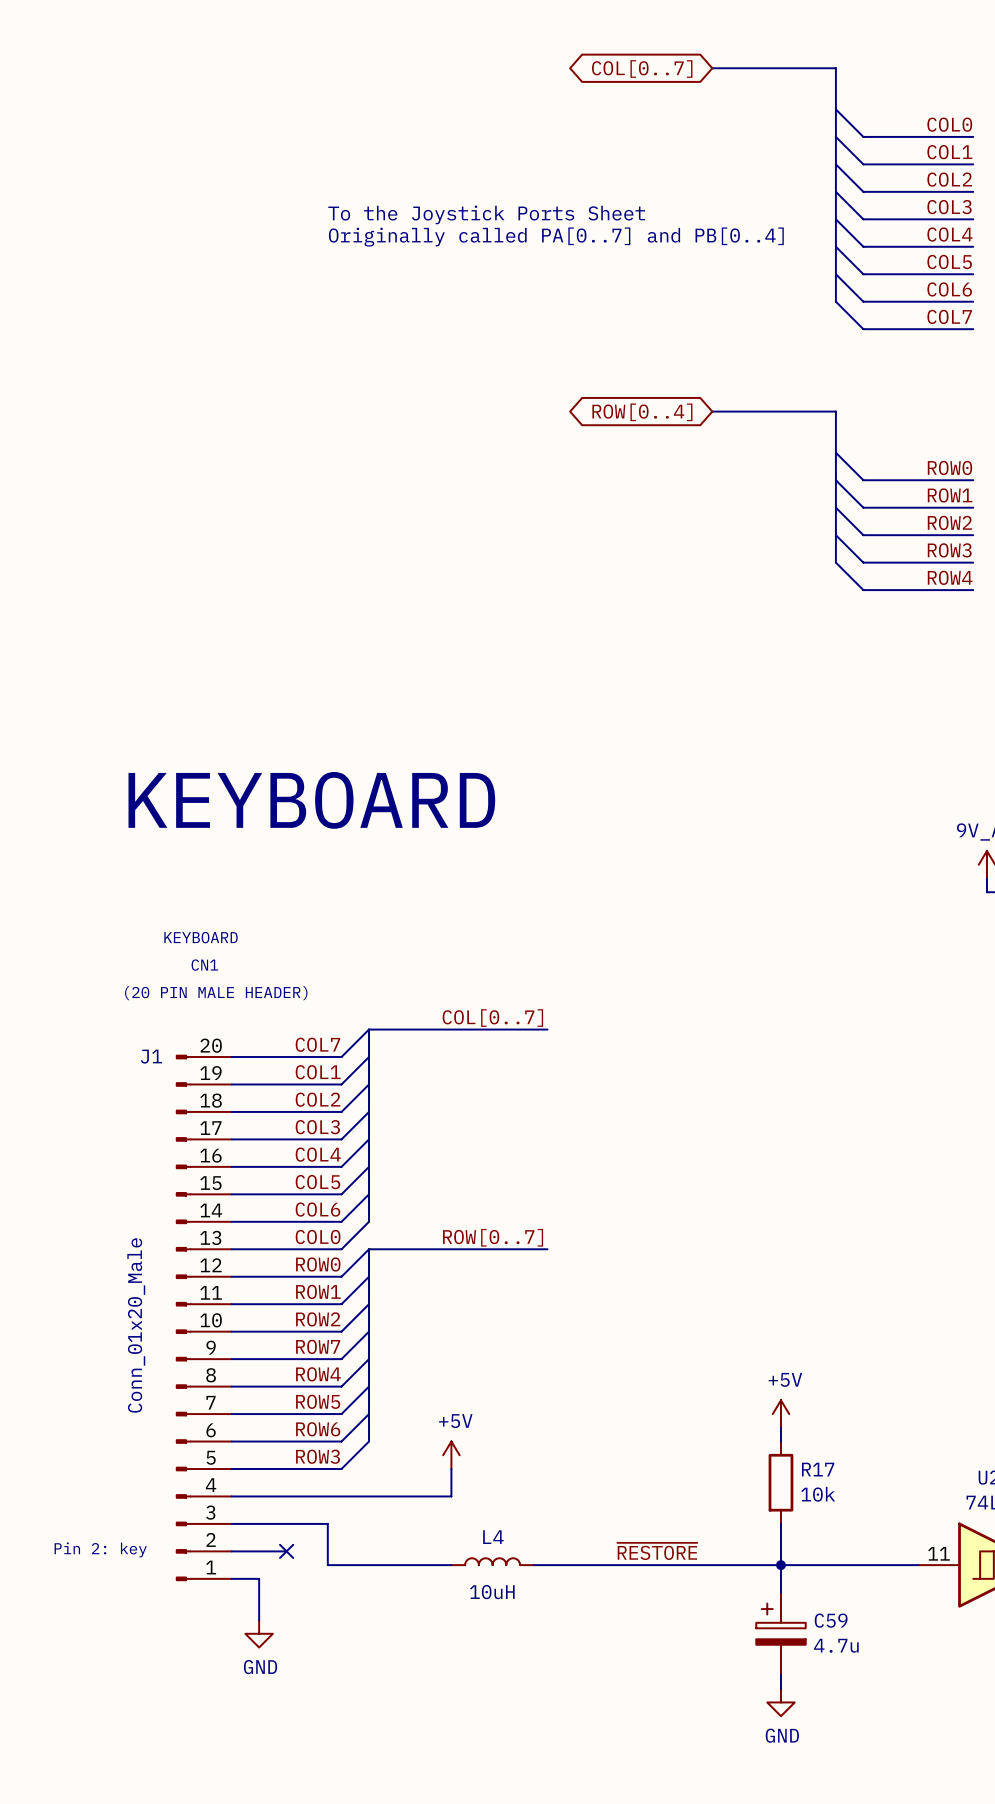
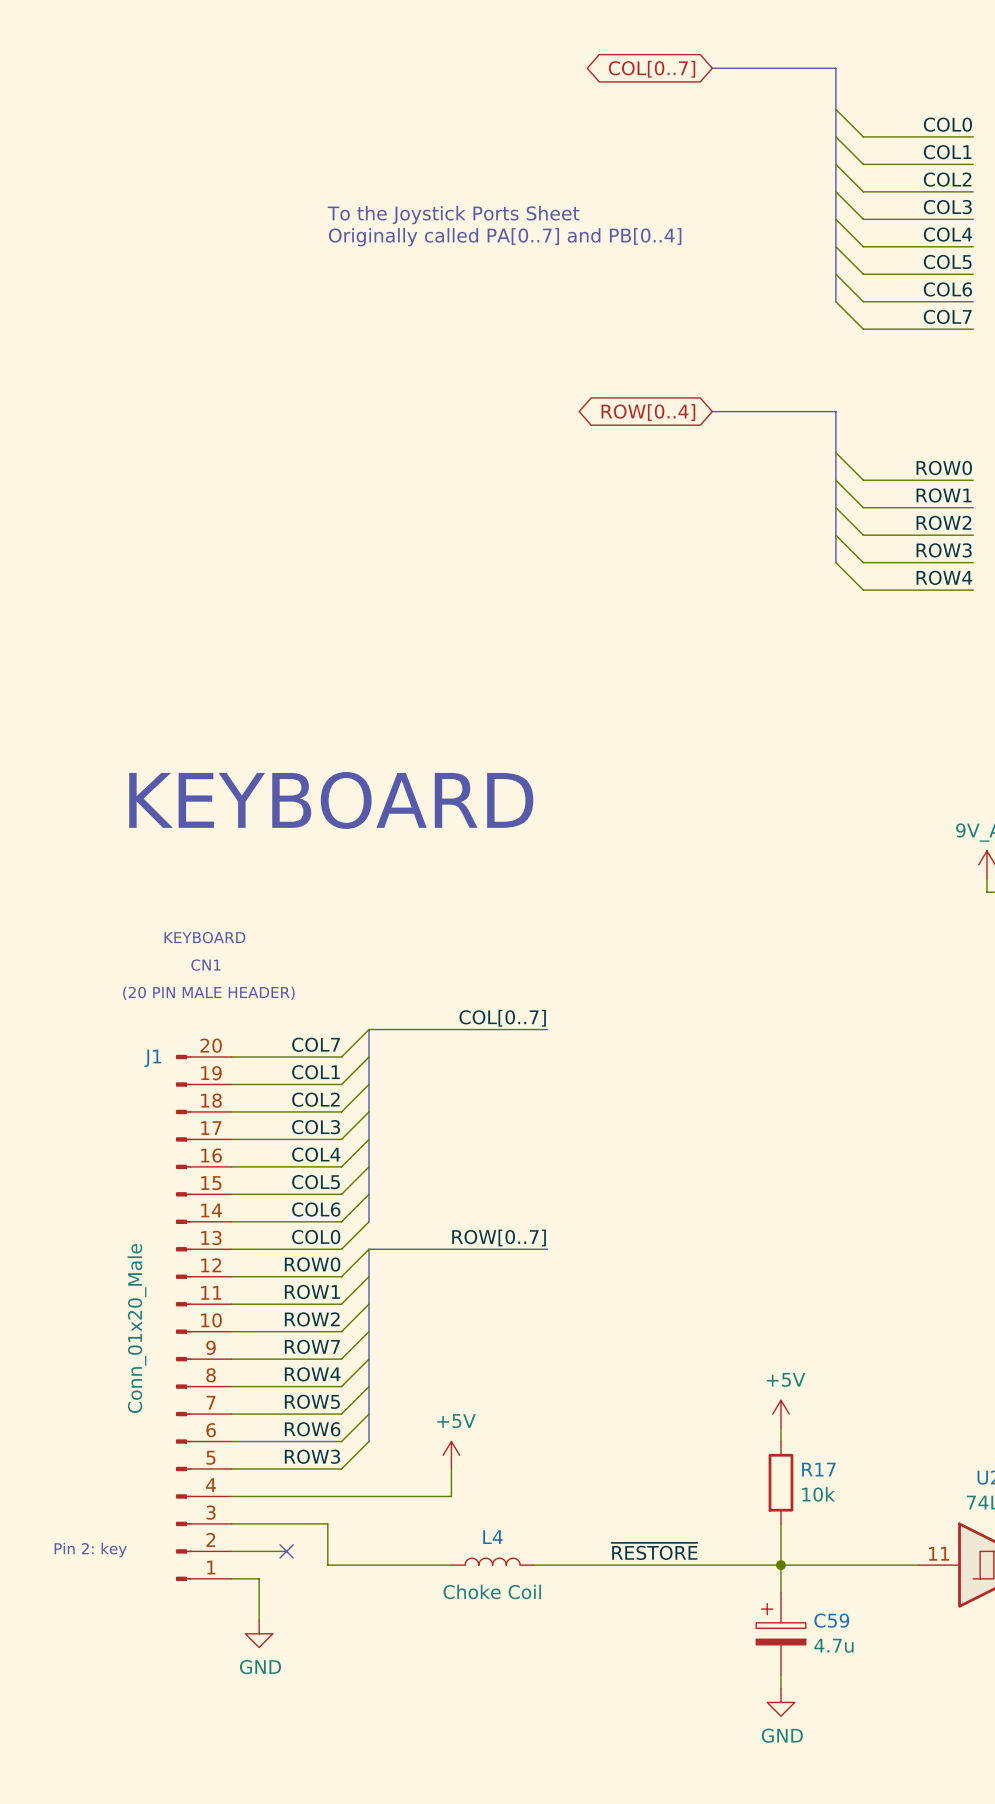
L4 value: 10uH (492, 1592) -> Choke Coil (492, 1591)

